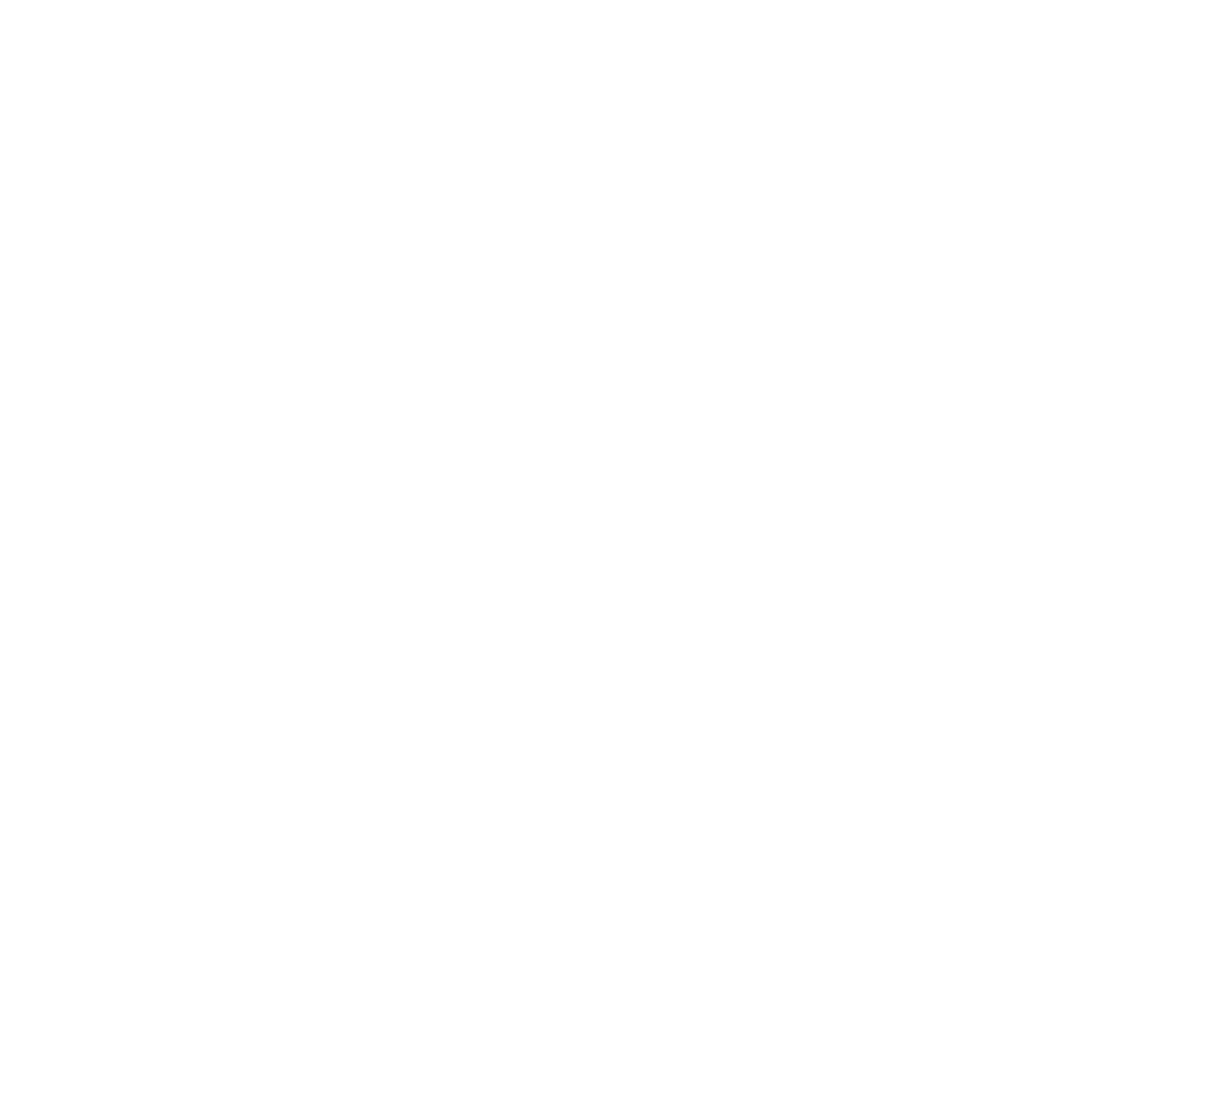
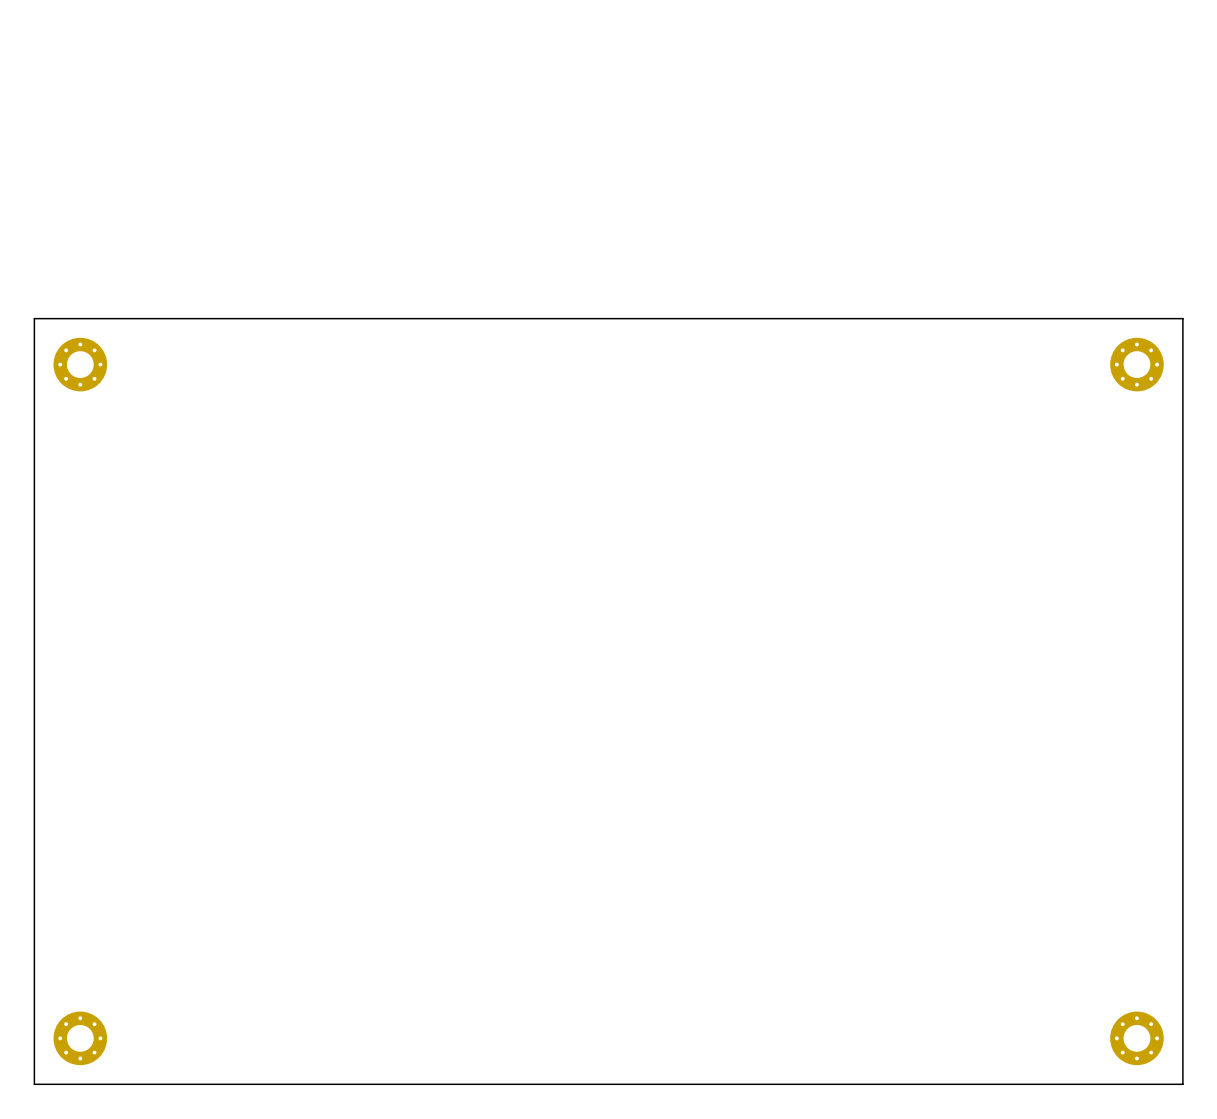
board edge: none -> (1182, 318) (1182, 1084) (34, 1084) (34, 318) (1182, 318)
part: none -> (80, 364)
part: none -> (1136, 364)
part: none -> (80, 1038)
part: none -> (1136, 1038)

